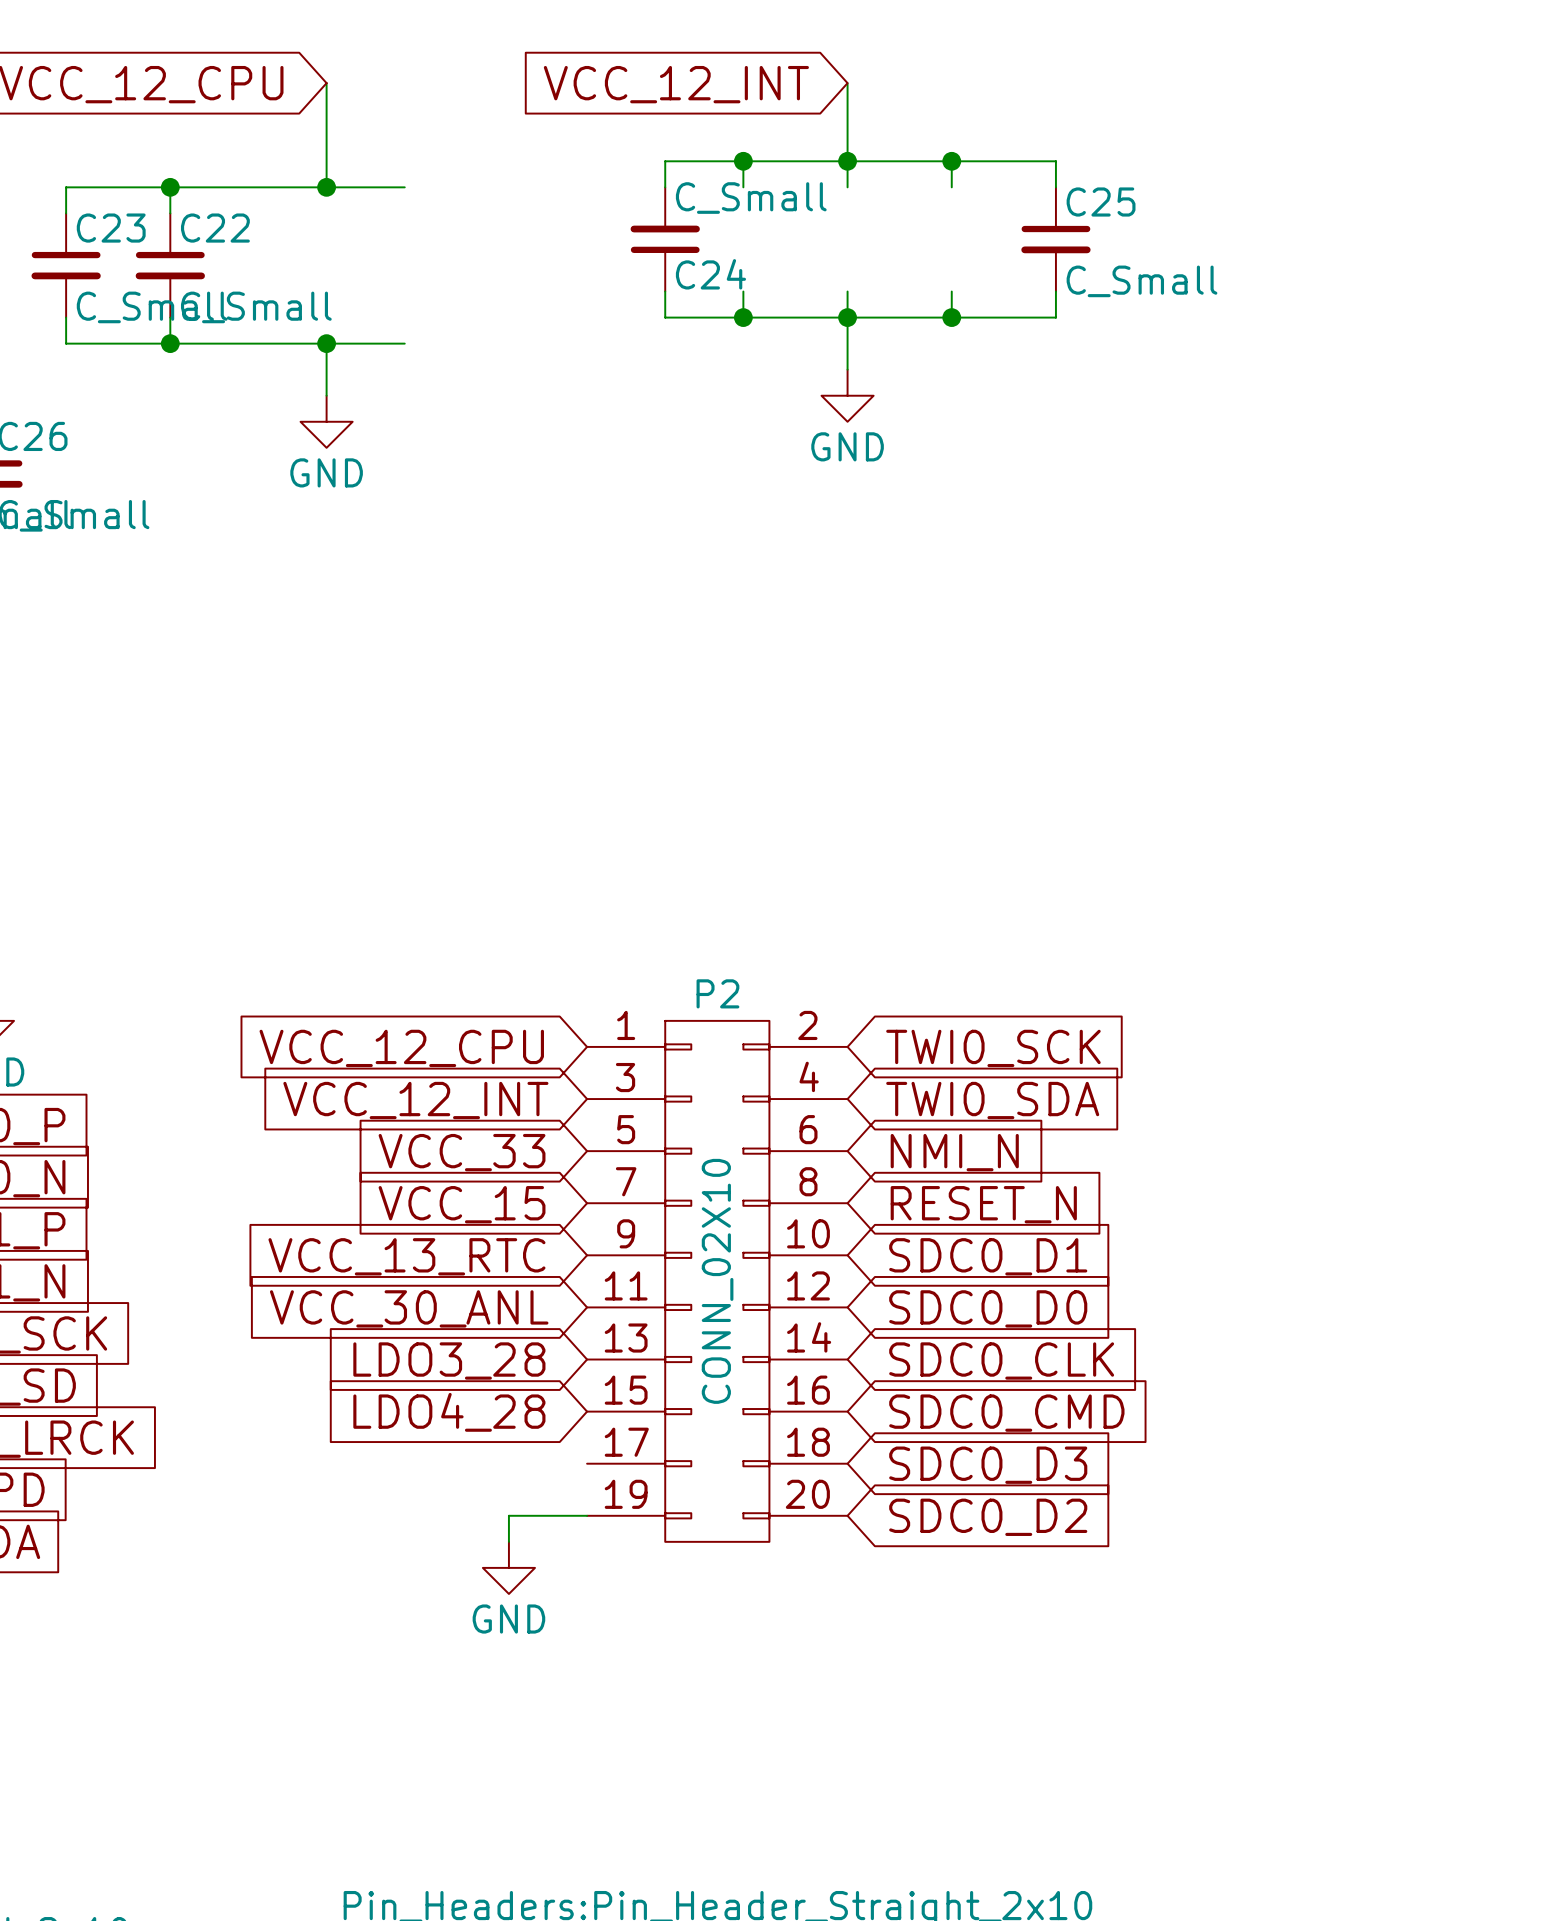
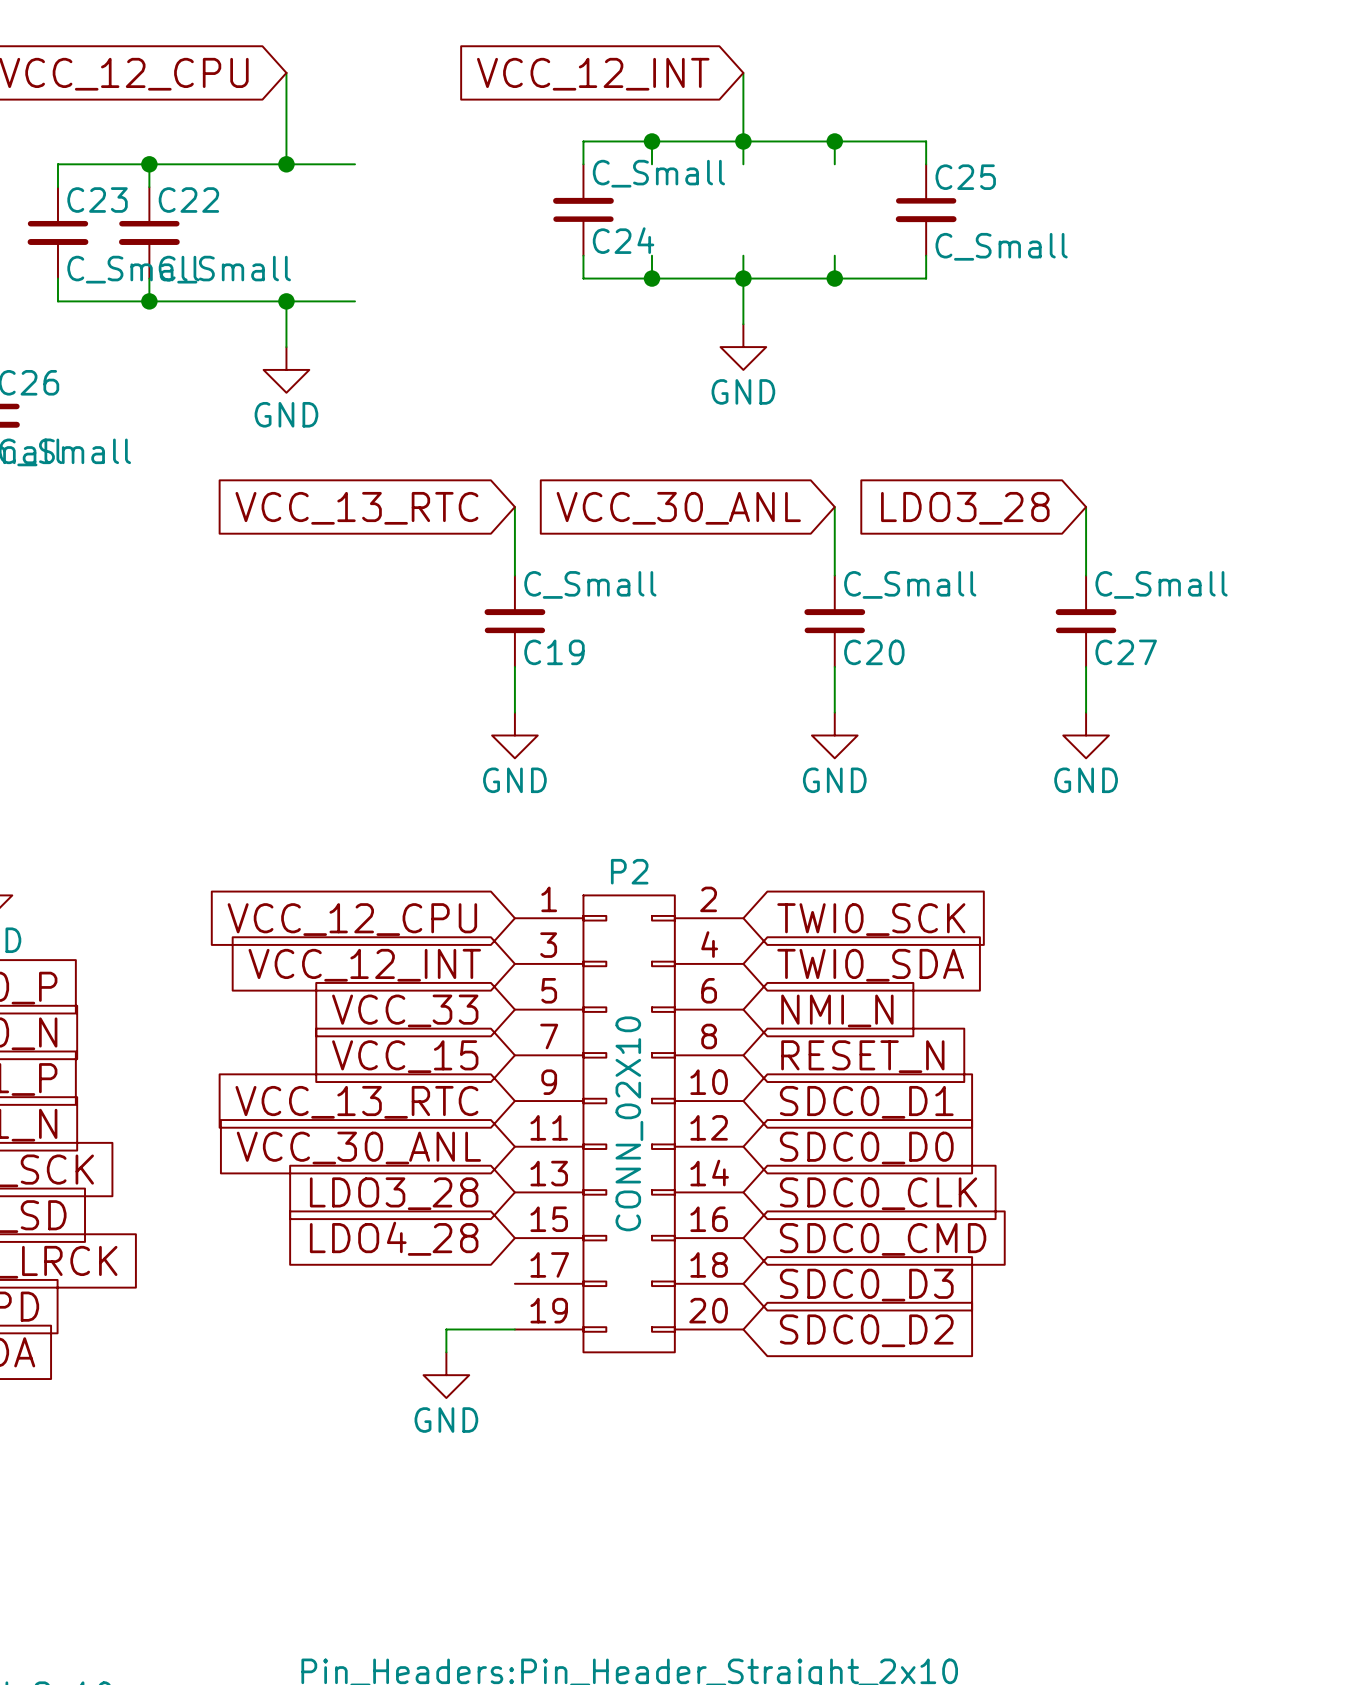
wire: none -> (514, 507) (514, 575)
wire: none -> (834, 507) (834, 575)
wire: none -> (1086, 507) (1086, 575)
global label: none -> VCC_13_RTC (356, 508)
global label: none -> VCC_30_ANL (678, 508)
global label: none -> LDO3_28 (965, 508)
C19: none -> C_Small (514, 621)
C20: none -> C_Small (834, 621)
C27: none -> C_Small (1086, 621)
wire: none -> (514, 666) (514, 712)
wire: none -> (834, 666) (834, 712)
wire: none -> (1086, 666) (1086, 712)
power symbol: none -> GND (514, 735)
power symbol: none -> GND (834, 735)
power symbol: none -> GND (1086, 735)

